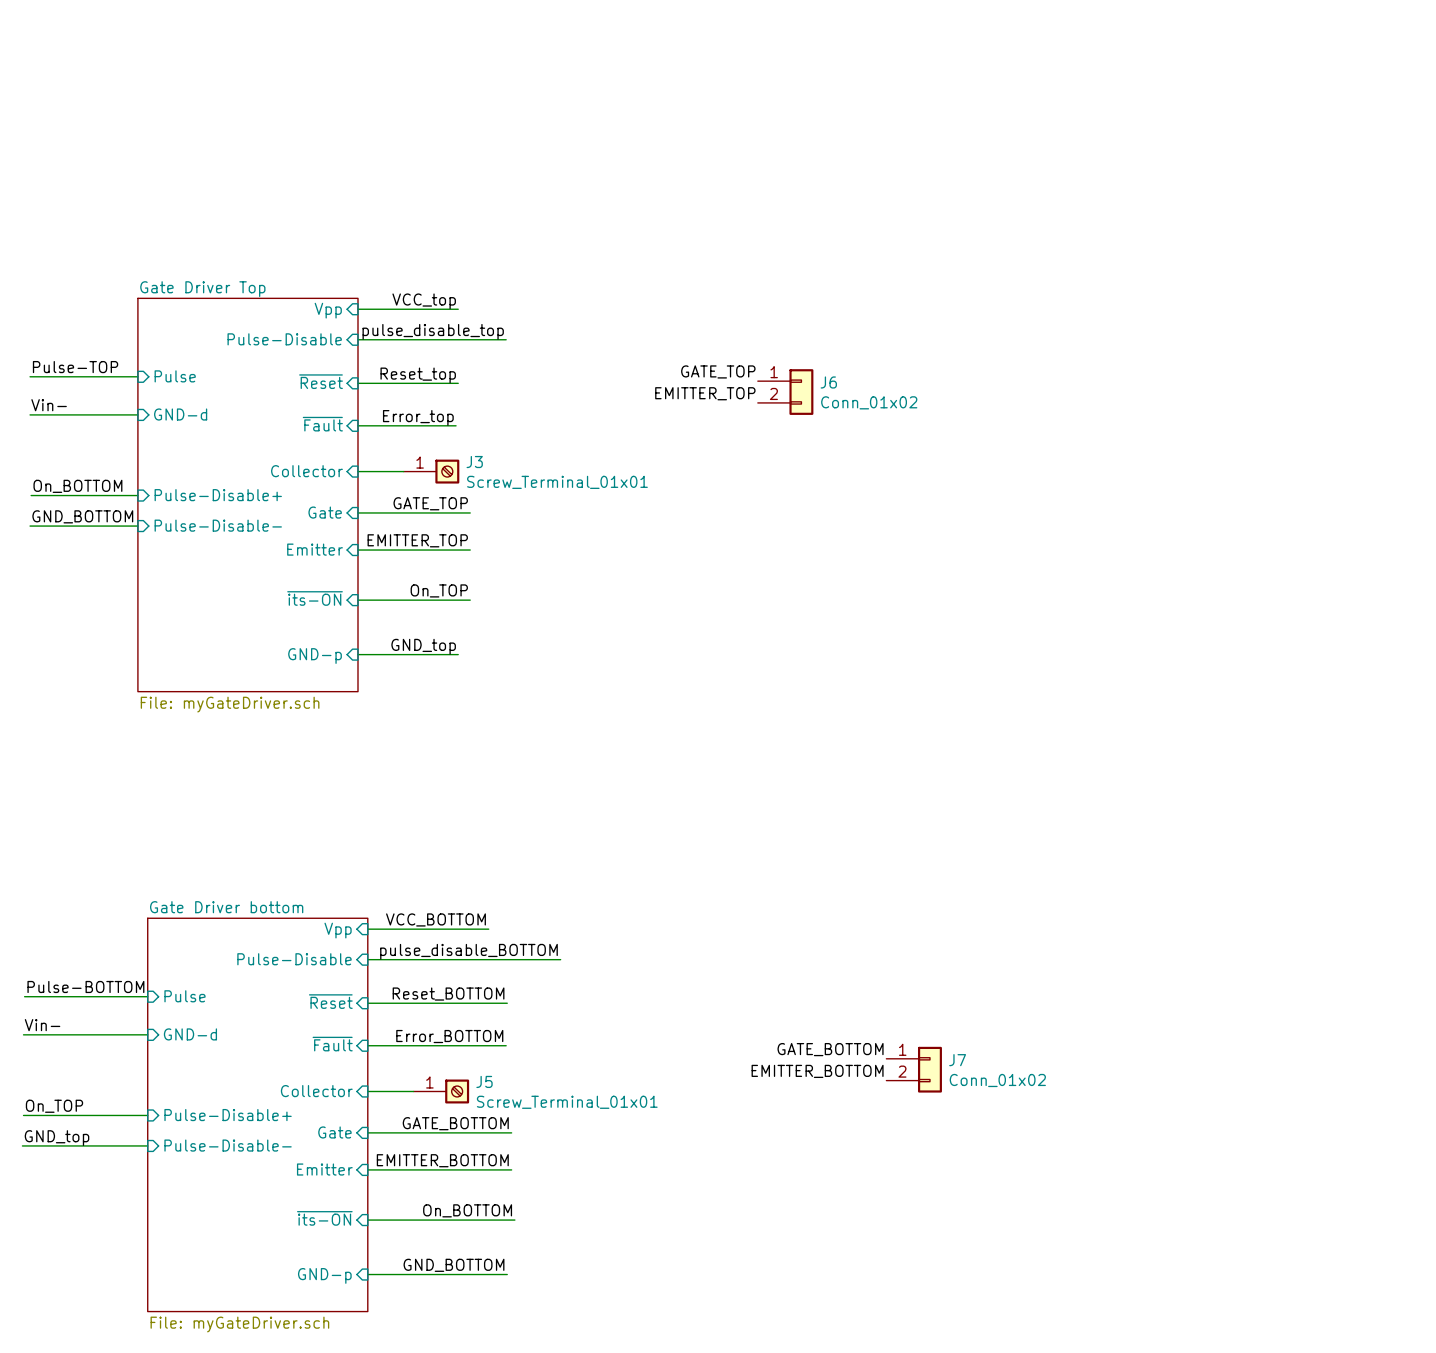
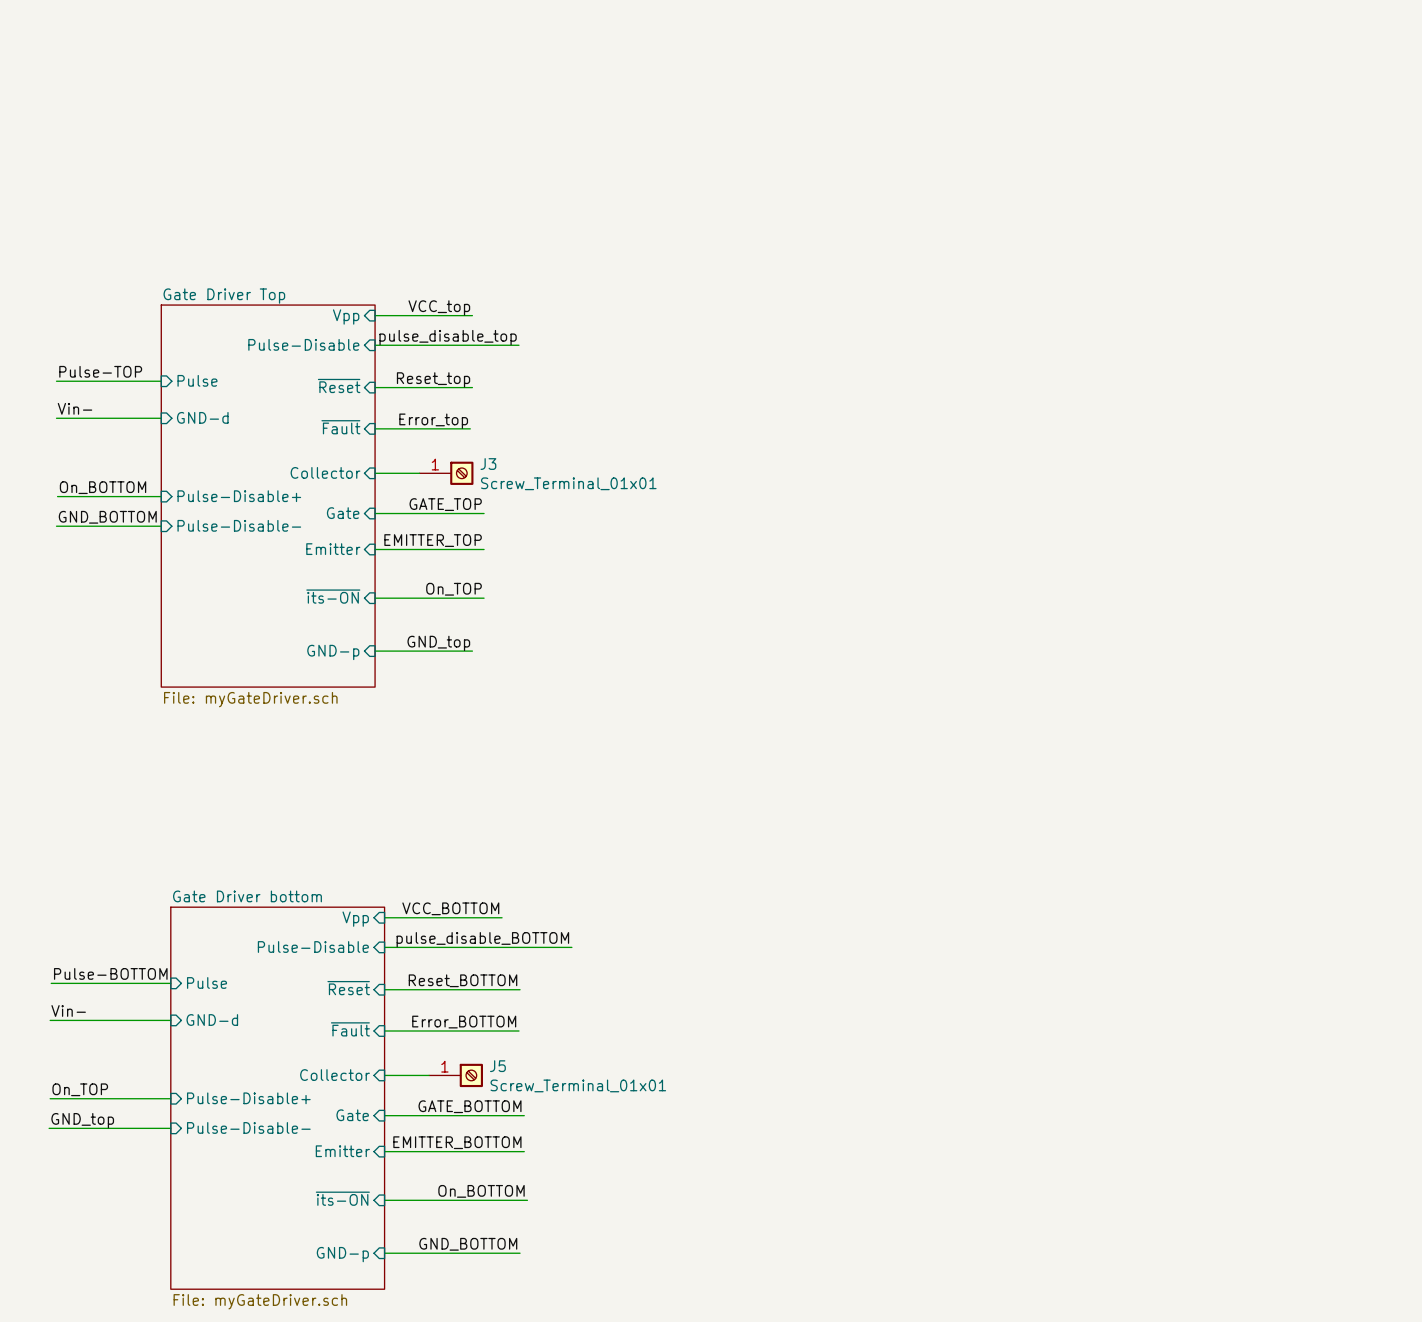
label: GATE_TOP (718, 371) -> none
J6: Conn_01x02 (785, 392) -> none
label: EMITTER_TOP (705, 393) -> none
label: GATE_BOTTOM (830, 1049) -> none
J7: Conn_01x02 (914, 1069) -> none
label: EMITTER_BOTTOM (817, 1071) -> none

